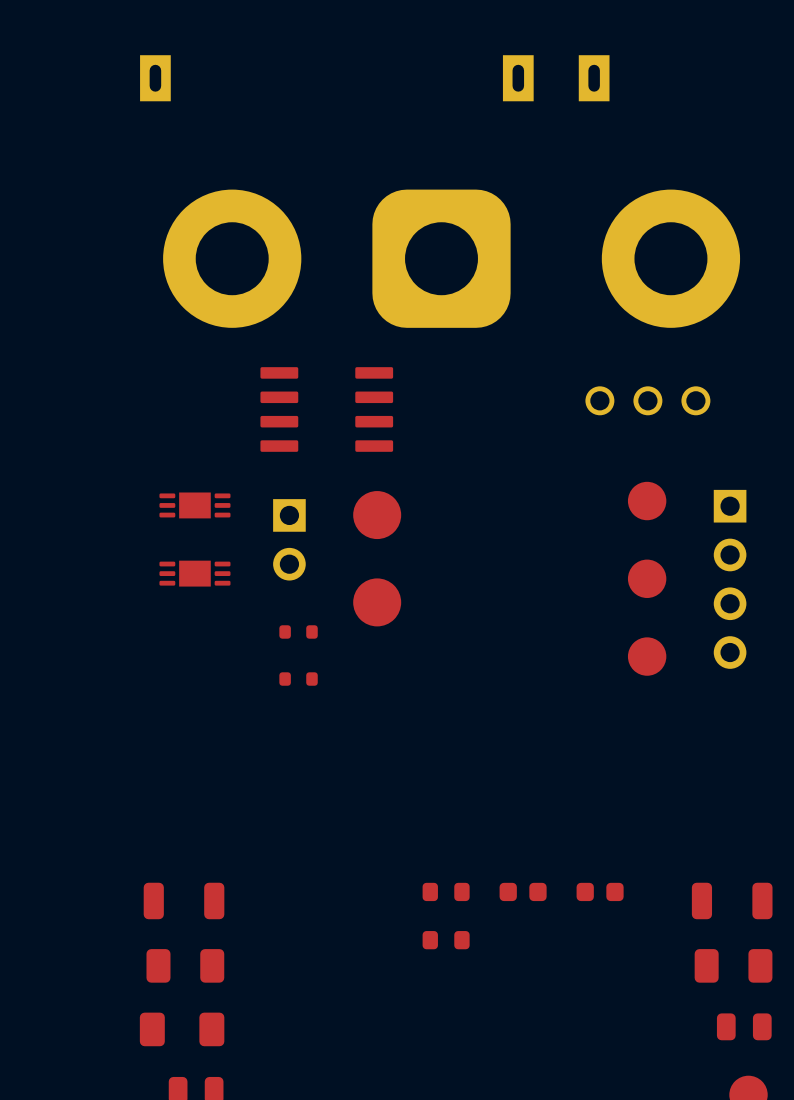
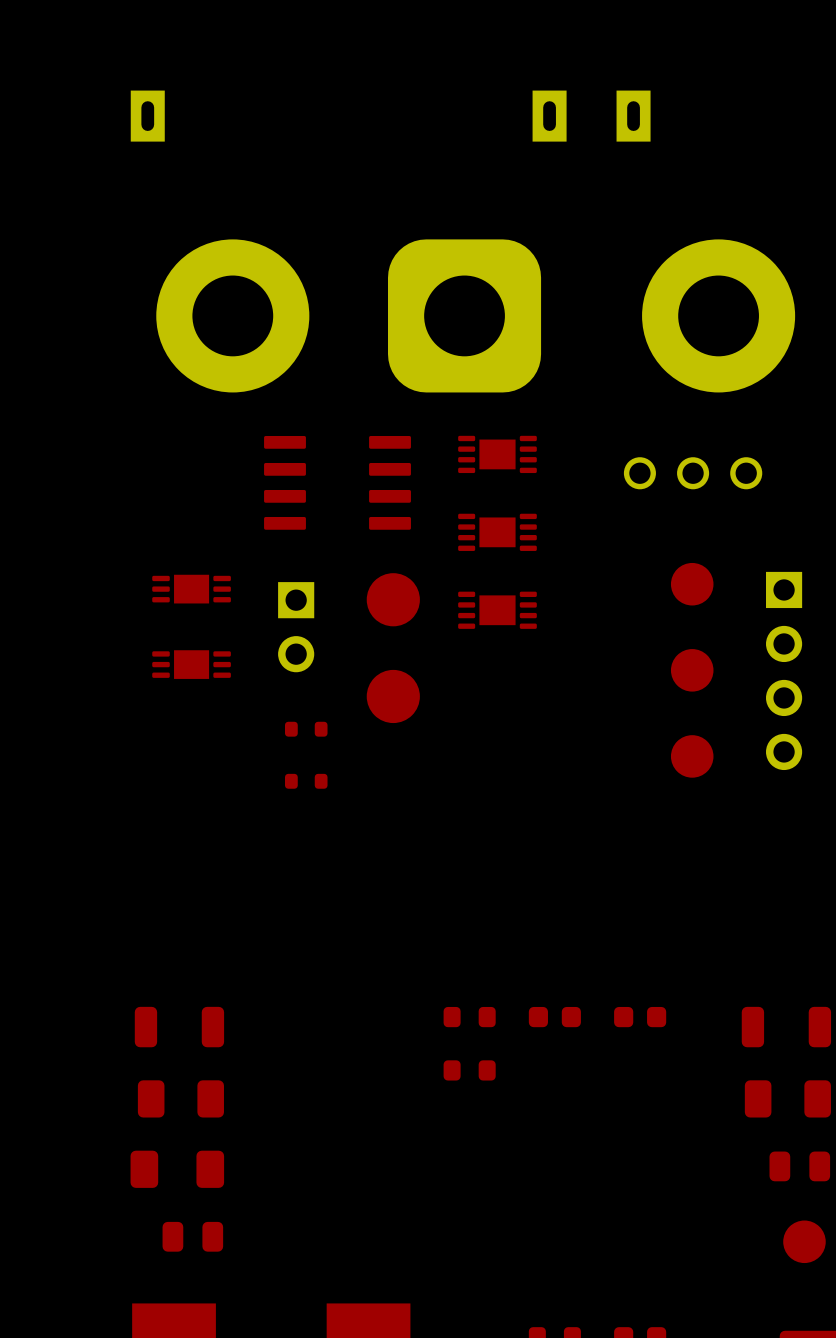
part: none -> (497, 454)
part: none -> (497, 532)
part: none -> (497, 610)

